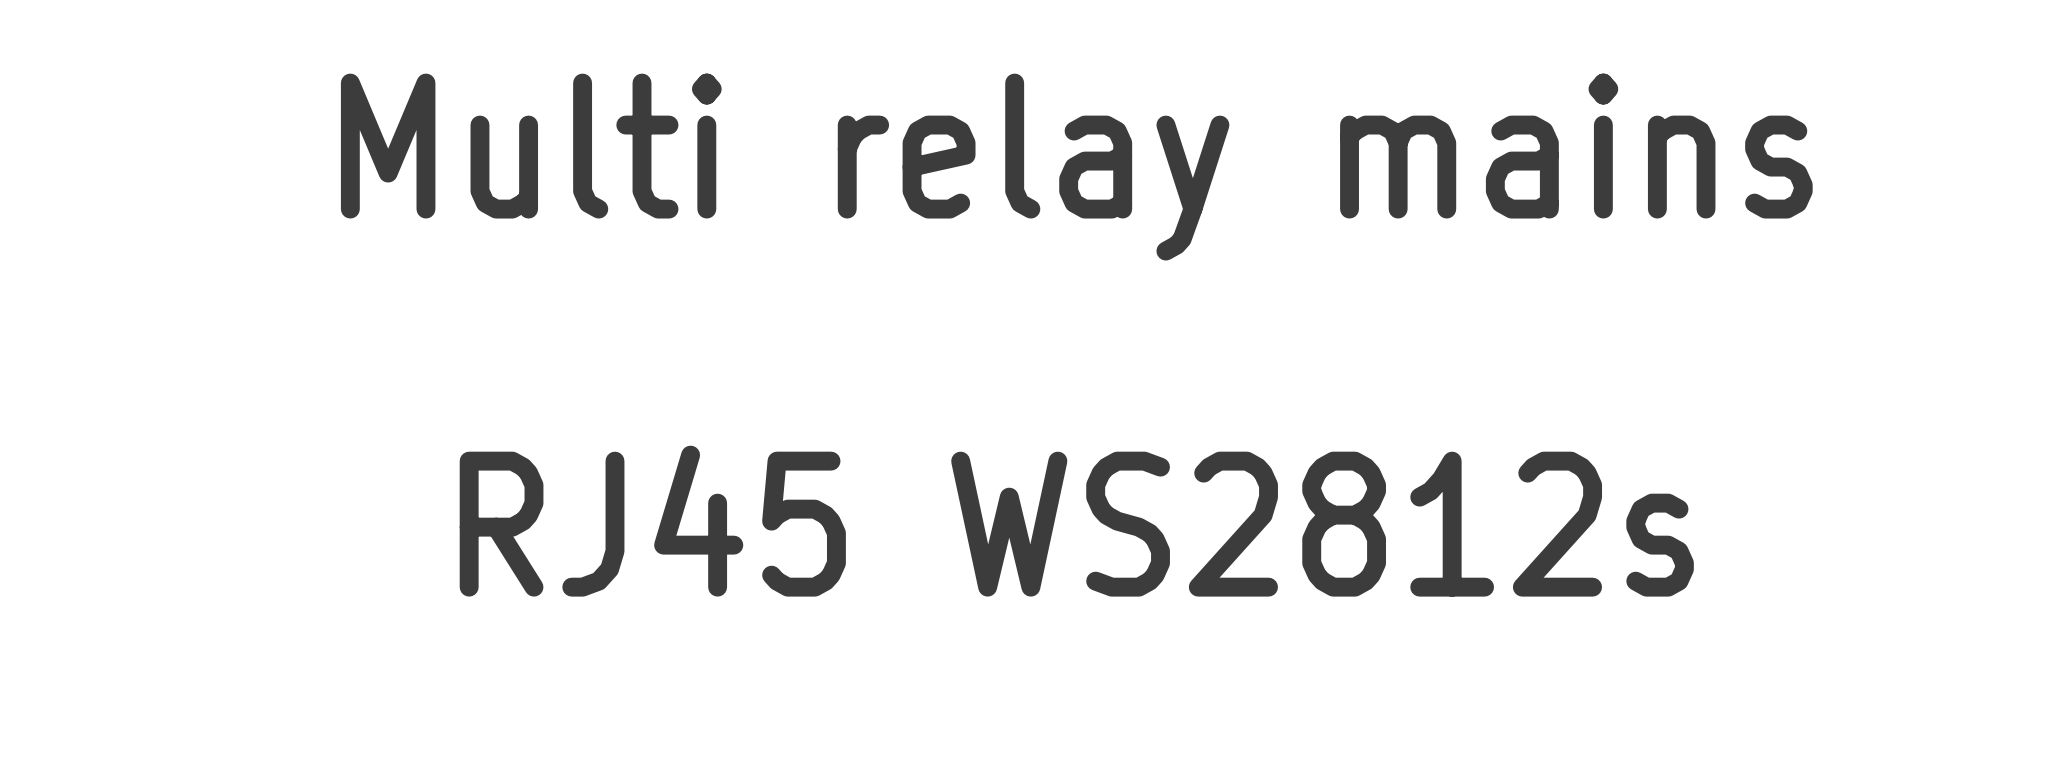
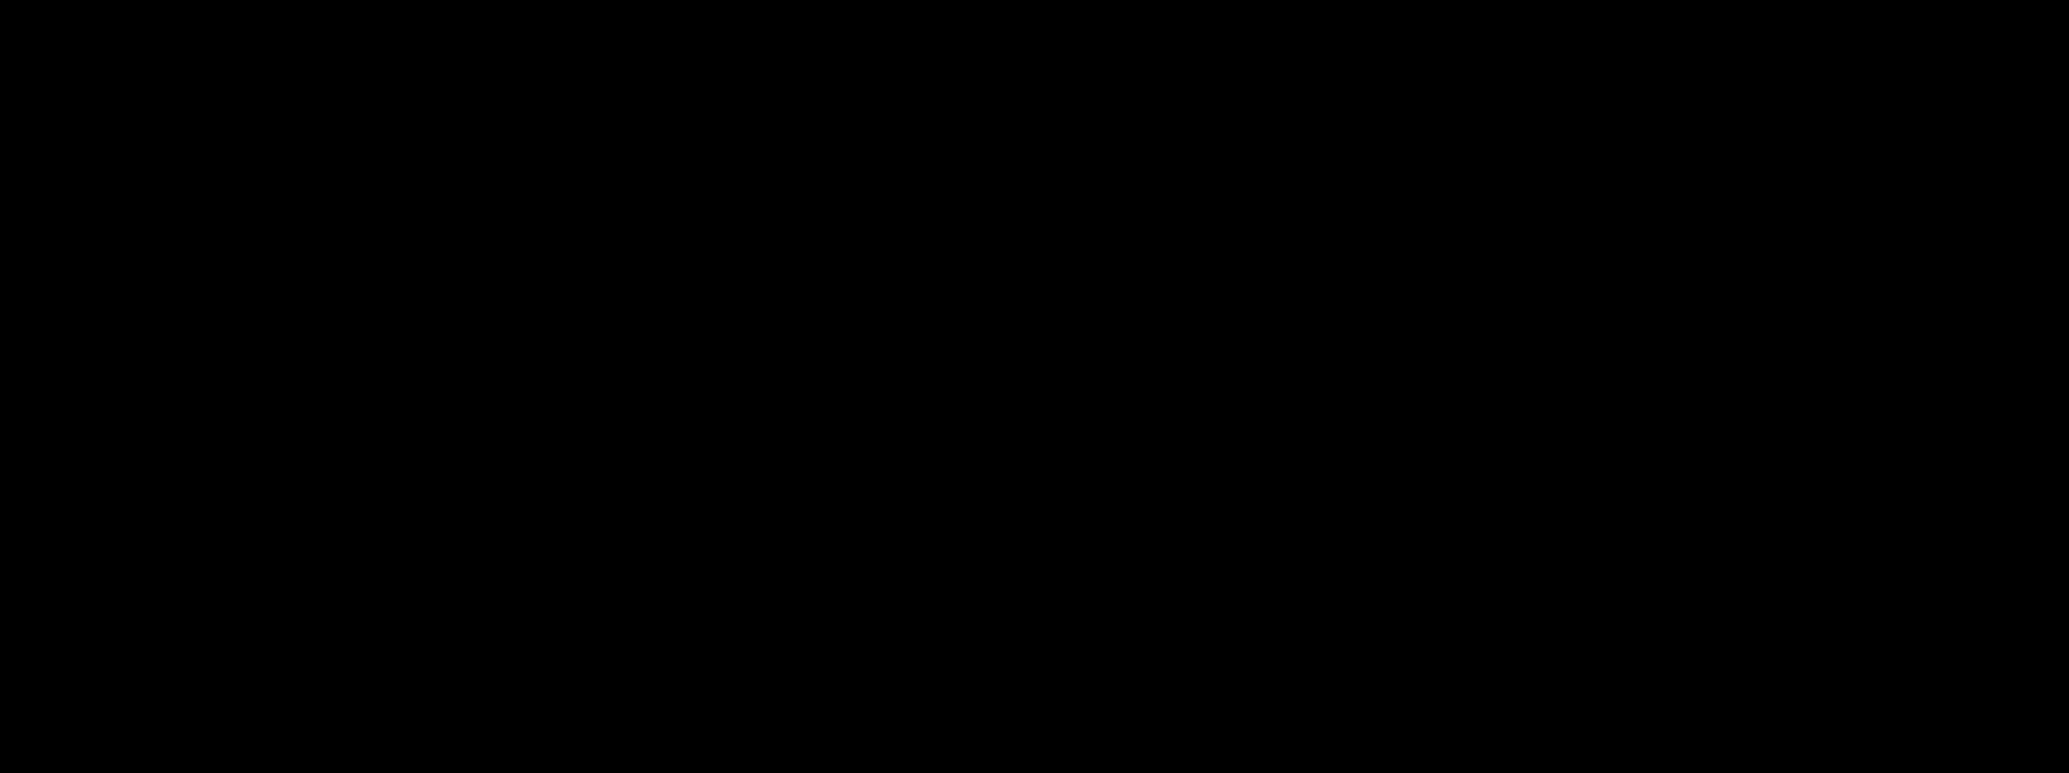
text: Multi relay mains (1076, 167) -> none
text: RJ45 WS2812s (1076, 521) -> none

